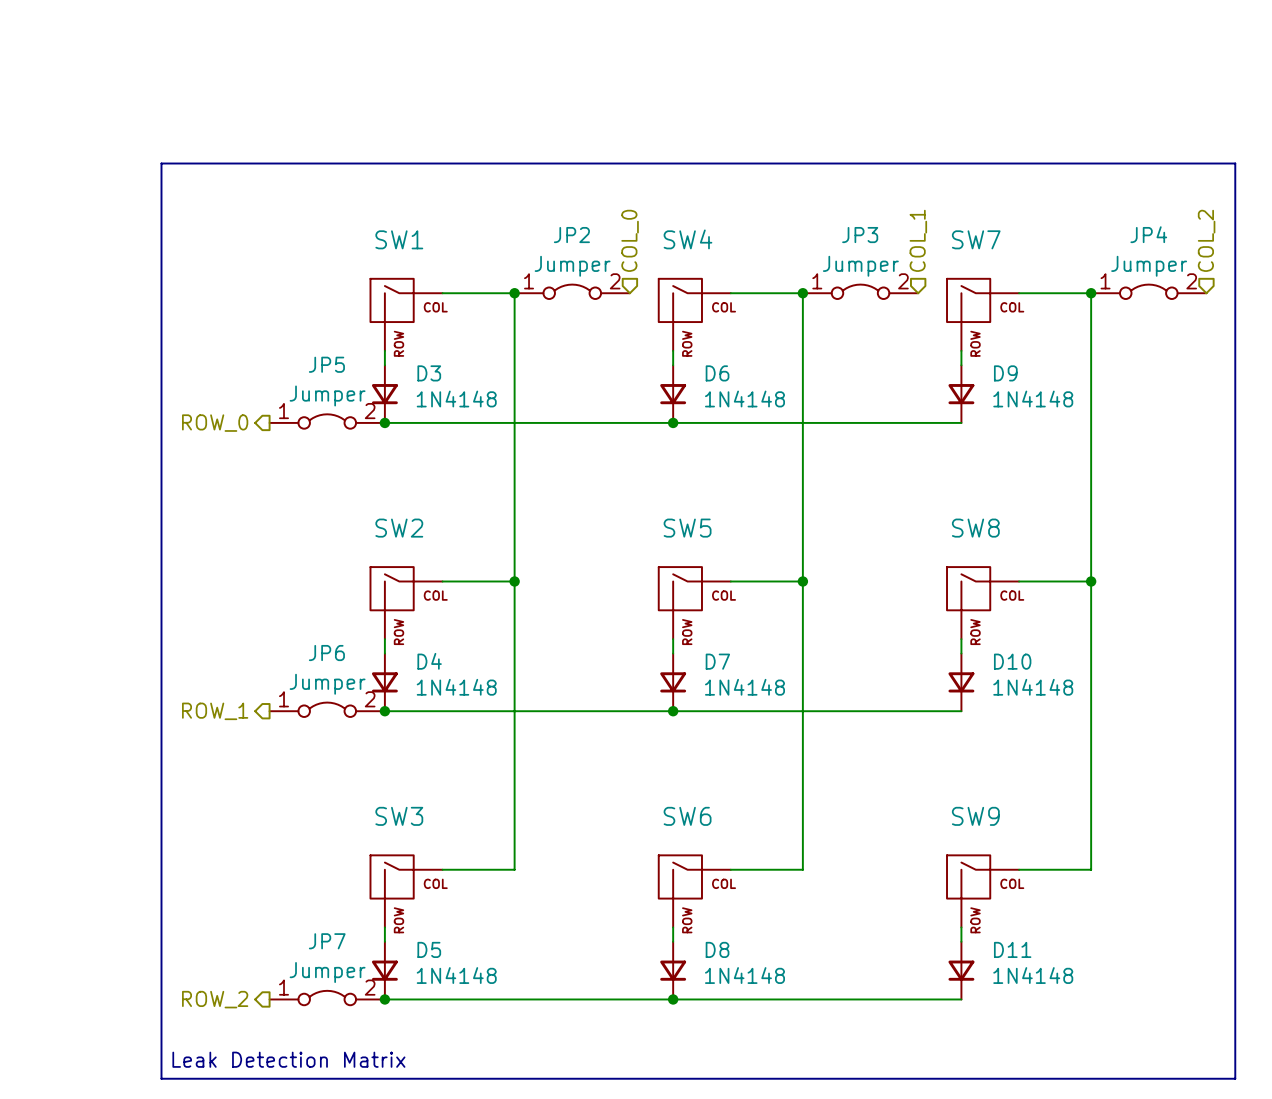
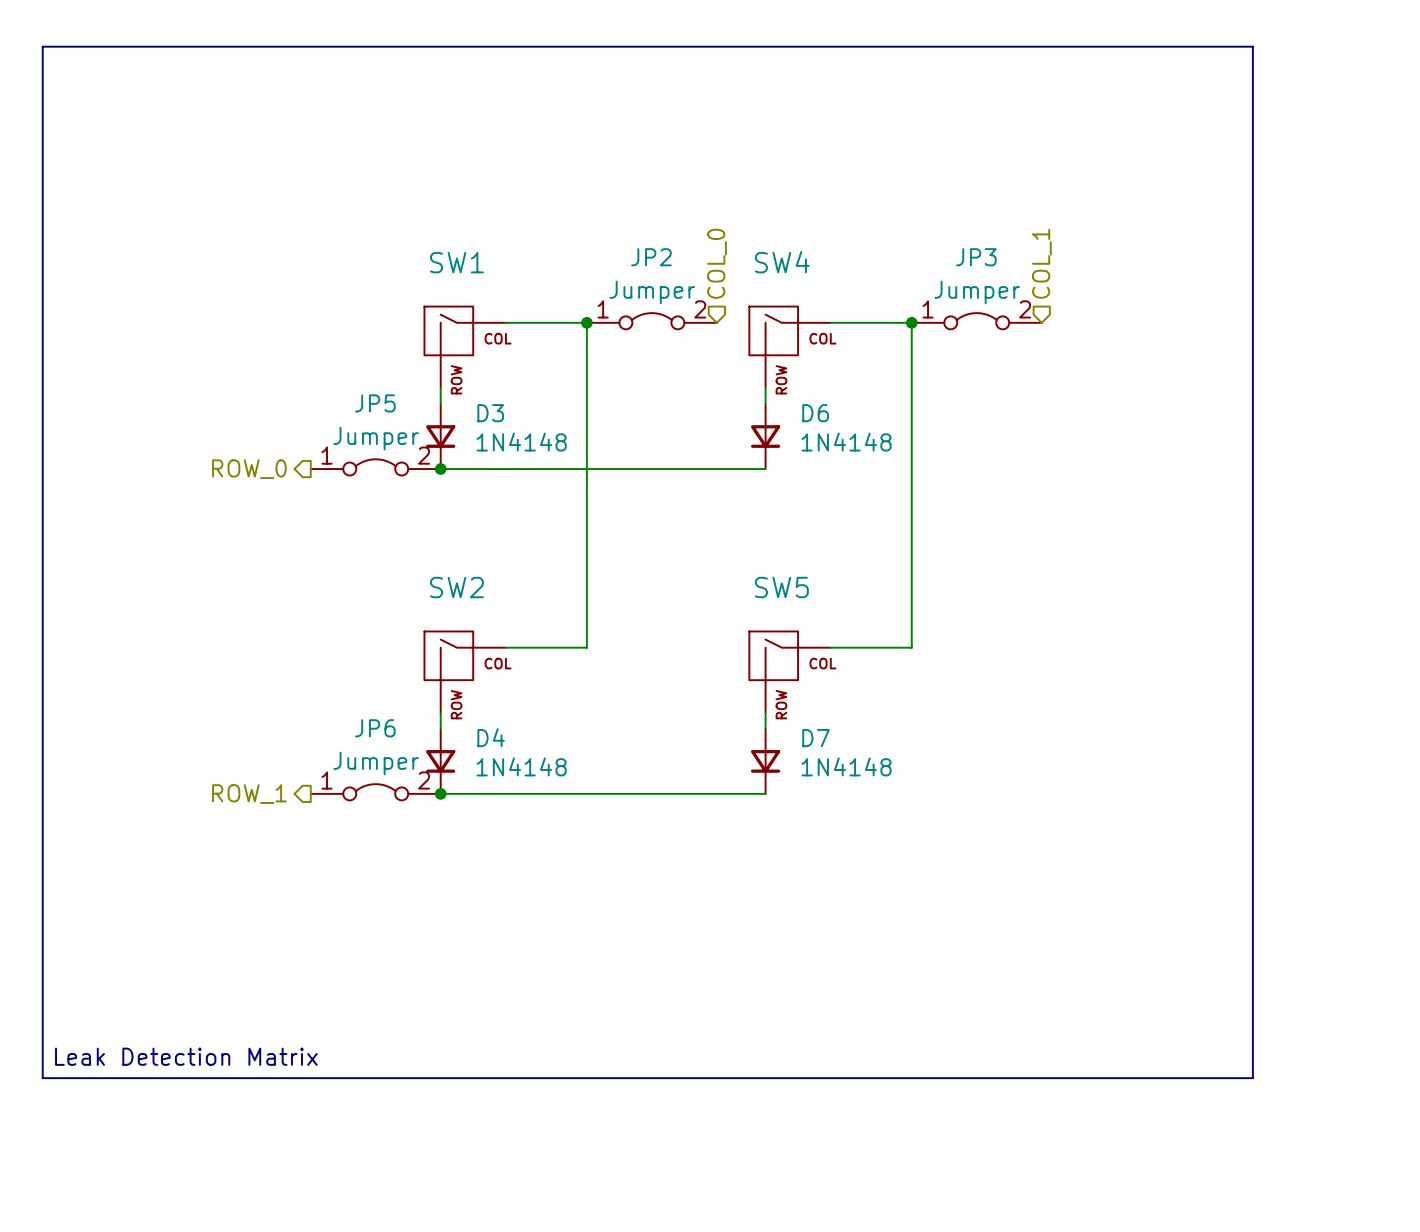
line: (161, 163) (1235, 163) (1235, 1078) (161, 1078) (161, 163) -> (42, 46) (1252, 46) (1252, 1078) (42, 1078) (42, 46)
hierarchical label: COL_2 (1206, 240) -> none
JP4: Jumper (1148, 291) -> none
wire: (1019, 293) (1091, 293) (1091, 869) (1019, 869) -> none
junction: (1091, 293) -> none
SW7: (983, 314) -> none
wire: (961, 350) (961, 365) -> none
D9: 1N4148 (961, 394) -> none
wire: (673, 422) (961, 422) -> none
junction: (673, 422) -> none
wire: (514, 581) (514, 869) (442, 869) -> none
junction: (514, 581) -> none
wire: (802, 581) (802, 869) (730, 869) -> none
junction: (802, 581) -> none
wire: (1019, 581) (1091, 581) -> none
junction: (1091, 581) -> none
SW8: (983, 603) -> none
wire: (961, 639) (961, 653) -> none
D10: 1N4148 (961, 682) -> none
wire: (673, 711) (961, 711) -> none
junction: (673, 711) -> none
SW3: (406, 891) -> none
SW6: (694, 891) -> none
SW9: (983, 891) -> none
wire: (384, 927) (384, 941) -> none
wire: (673, 927) (673, 941) -> none
wire: (961, 927) (961, 941) -> none
D5: 1N4148 (384, 970) -> none
D8: 1N4148 (673, 970) -> none
D11: 1N4148 (961, 970) -> none
JP7: Jumper (327, 998) -> none
hierarchical label: ROW_2 (215, 999) -> none
wire: (384, 999) (961, 999) -> none
junction: (384, 999) -> none
junction: (673, 999) -> none
text position: Leak Detection Matrix (288, 1059) -> Leak Detection Matrix (186, 1056)

